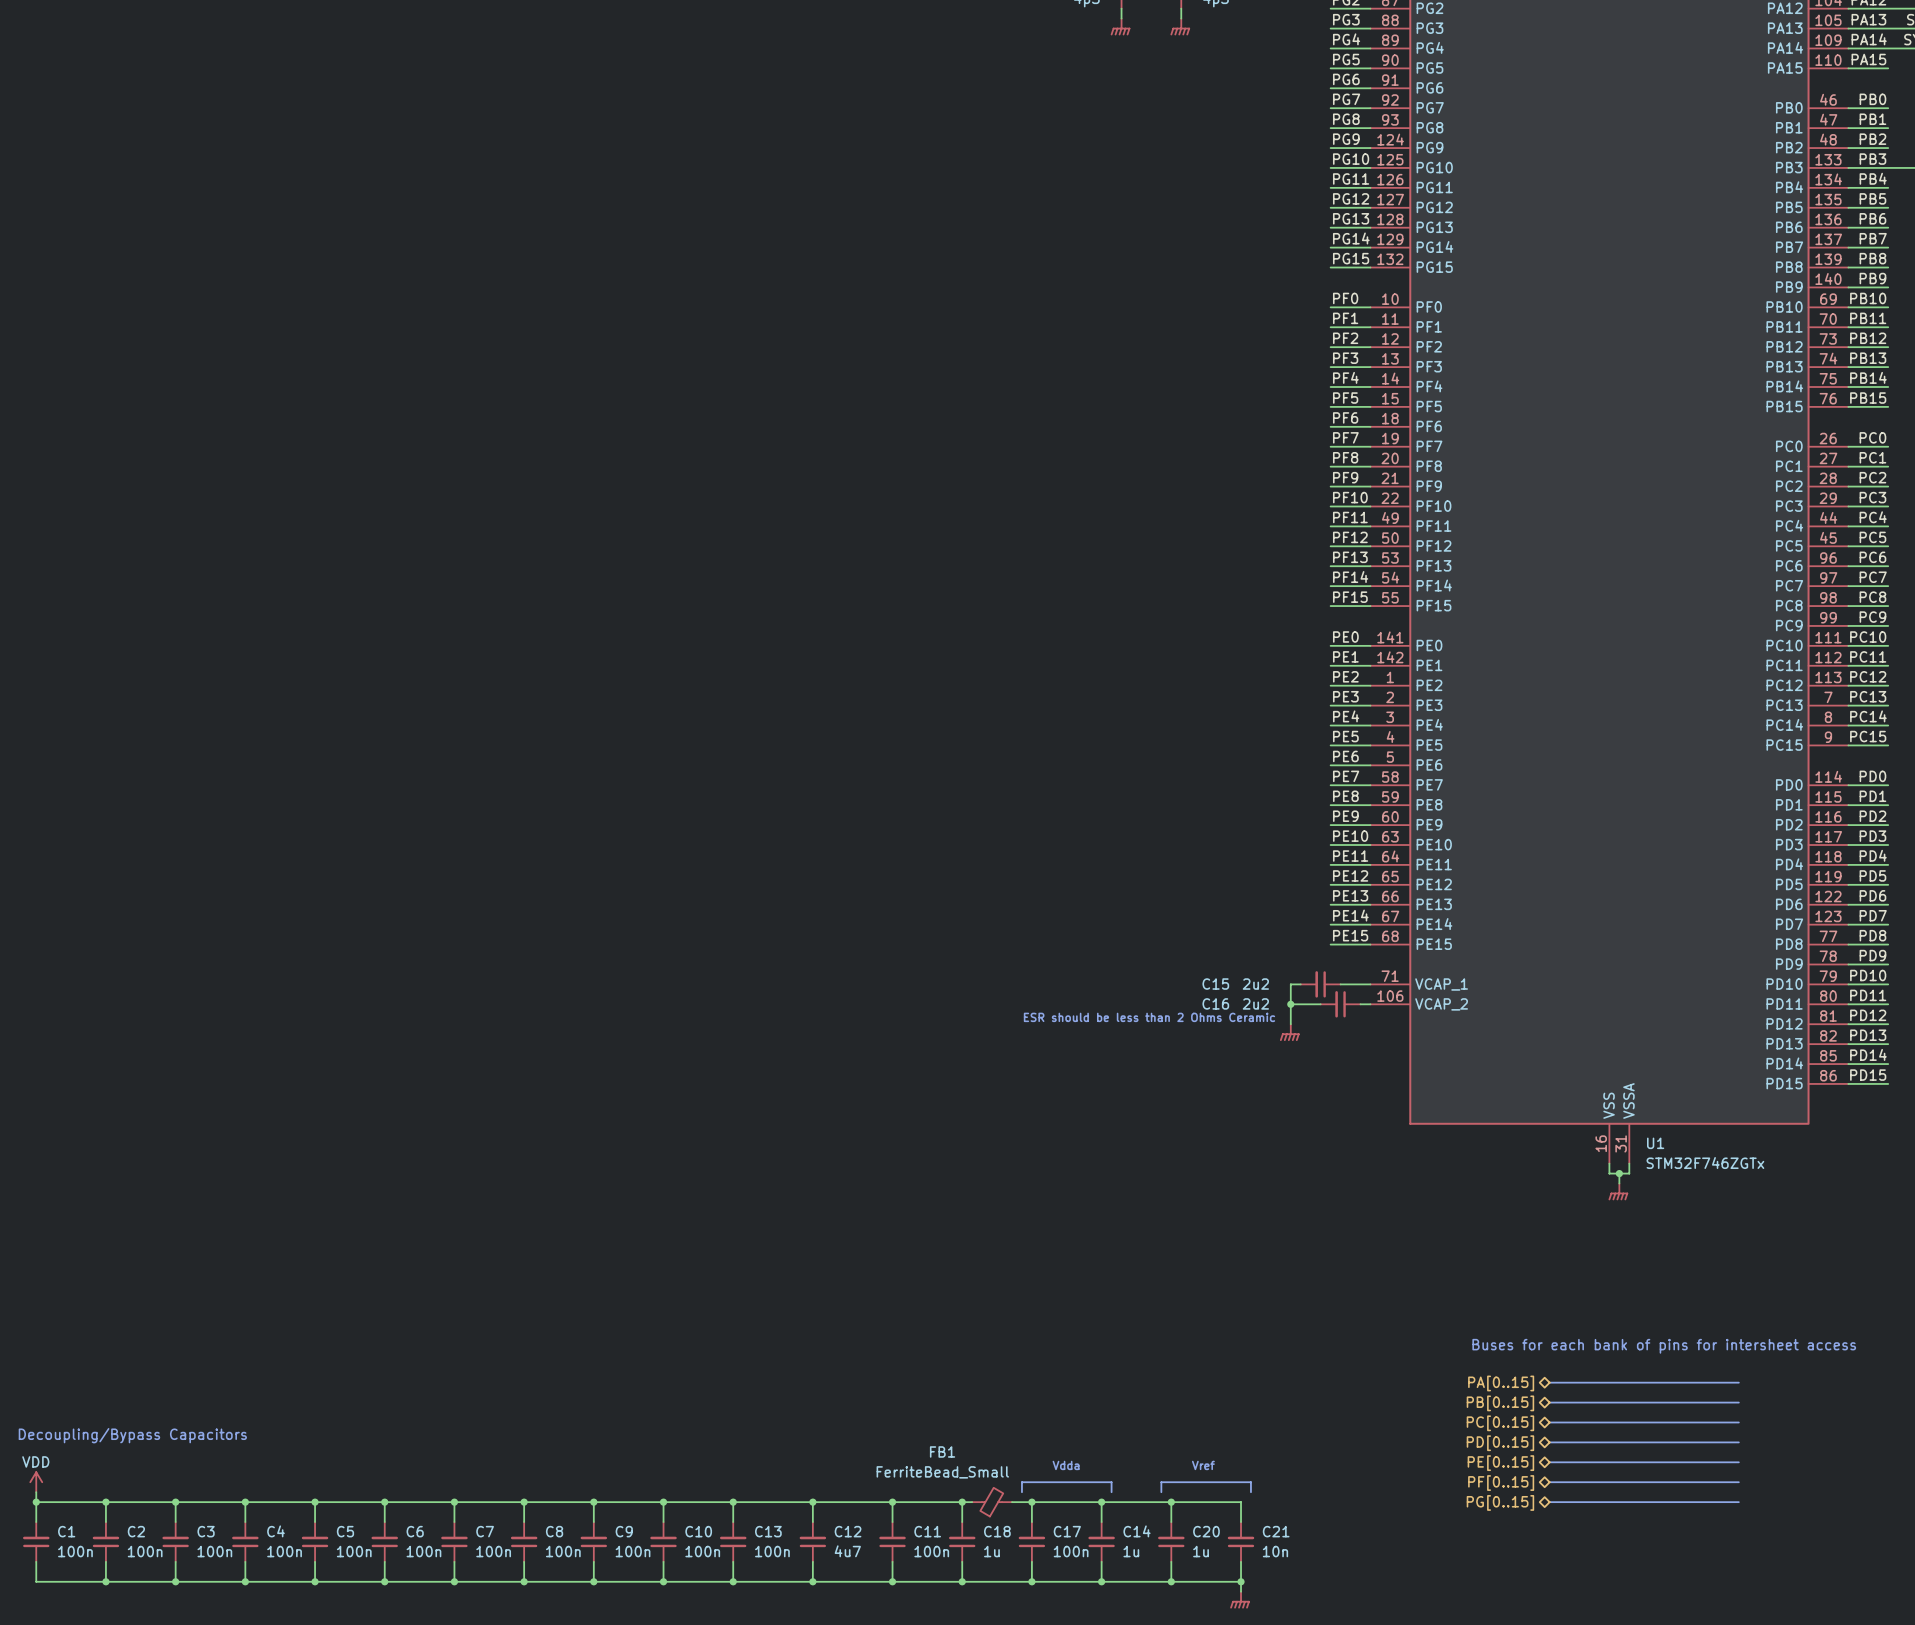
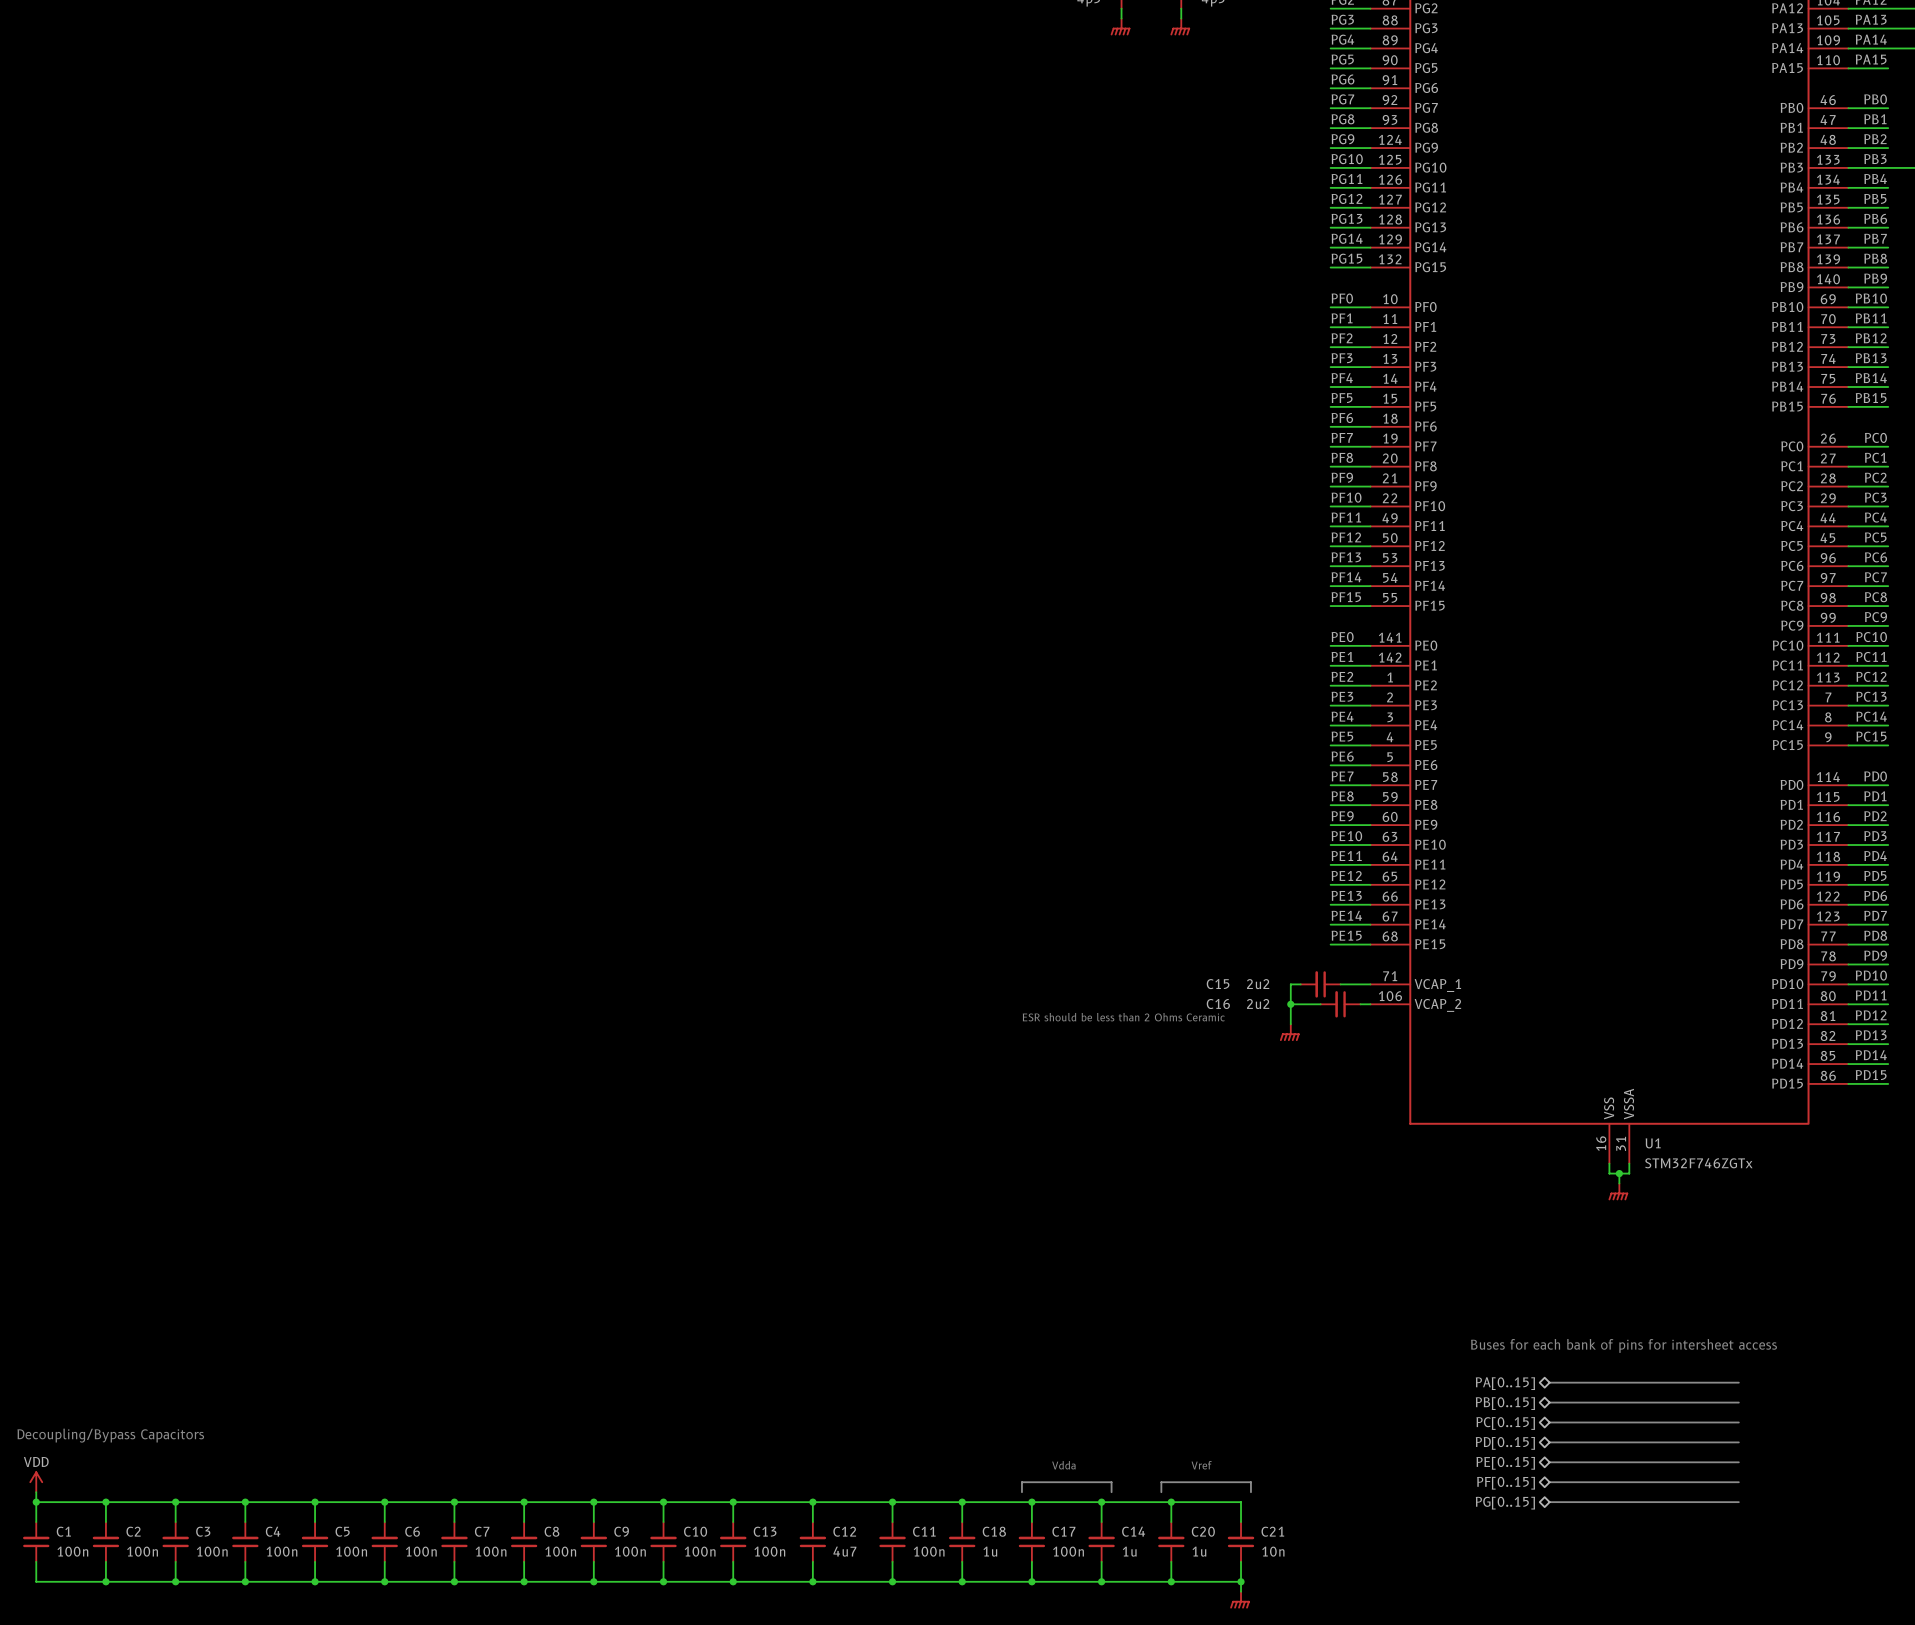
FB1: FerriteBead_Small (992, 1502) -> none

